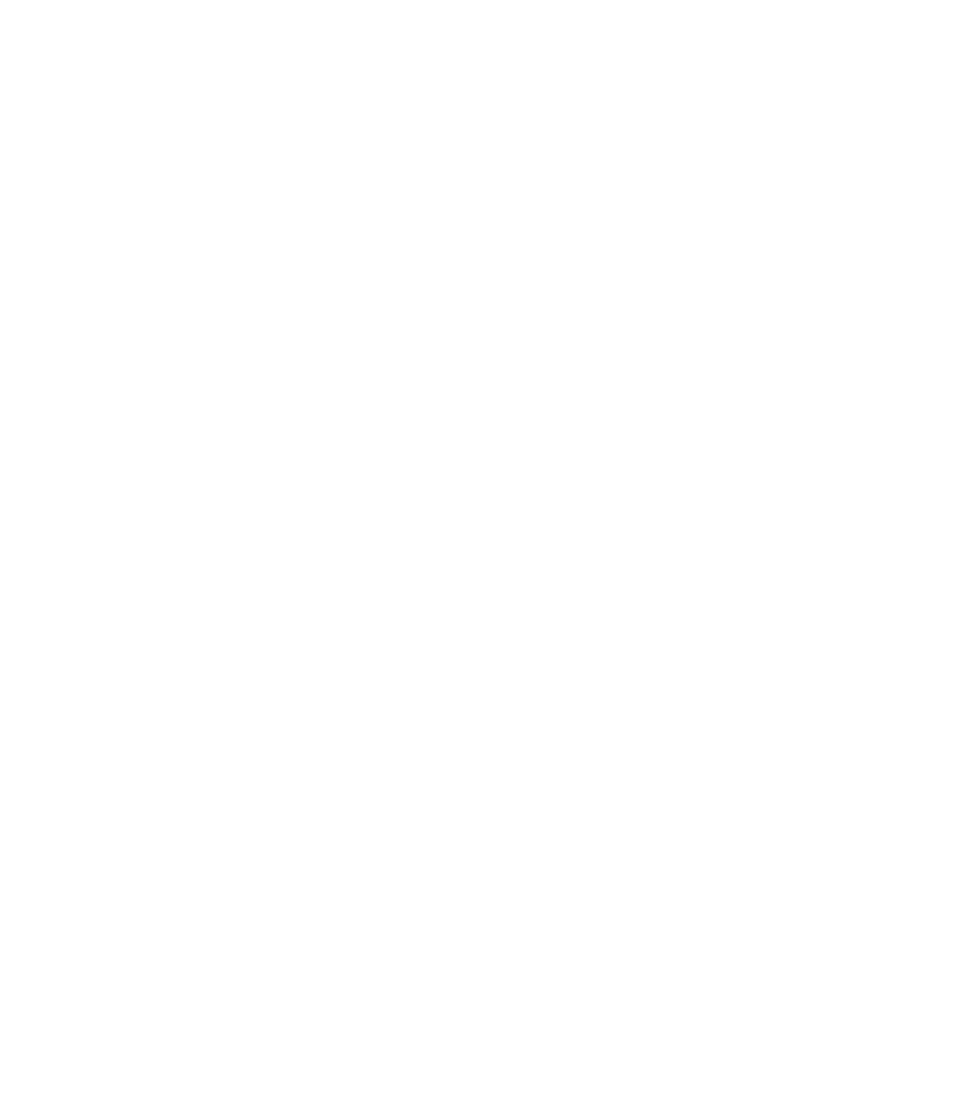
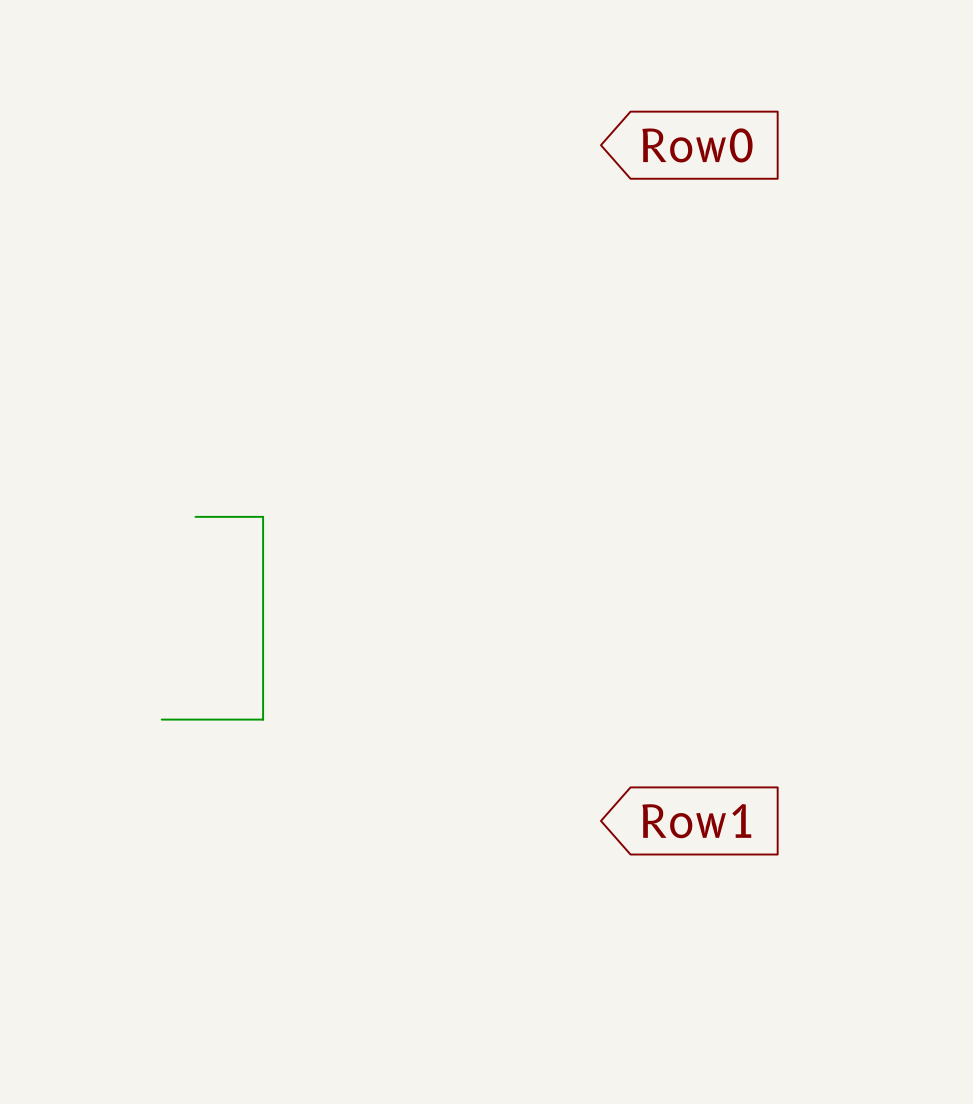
global label: none -> Row0 (697, 145)
wire: none -> (195, 516) (263, 516) (263, 719) (161, 719)
global label: none -> Row1 (696, 821)

